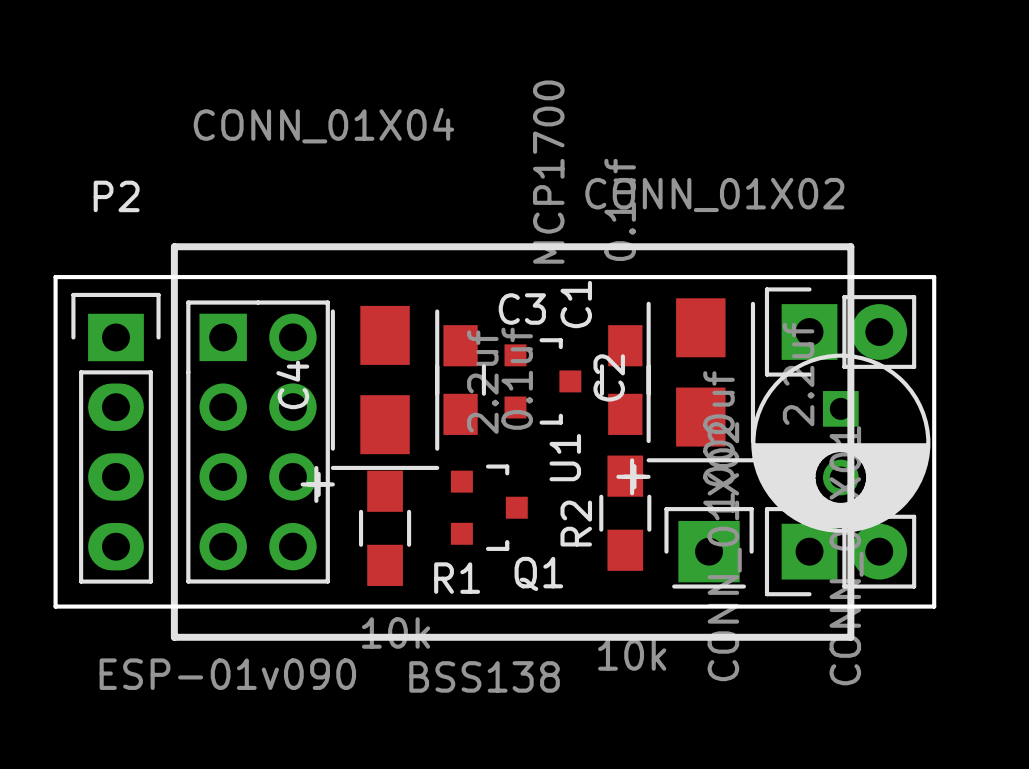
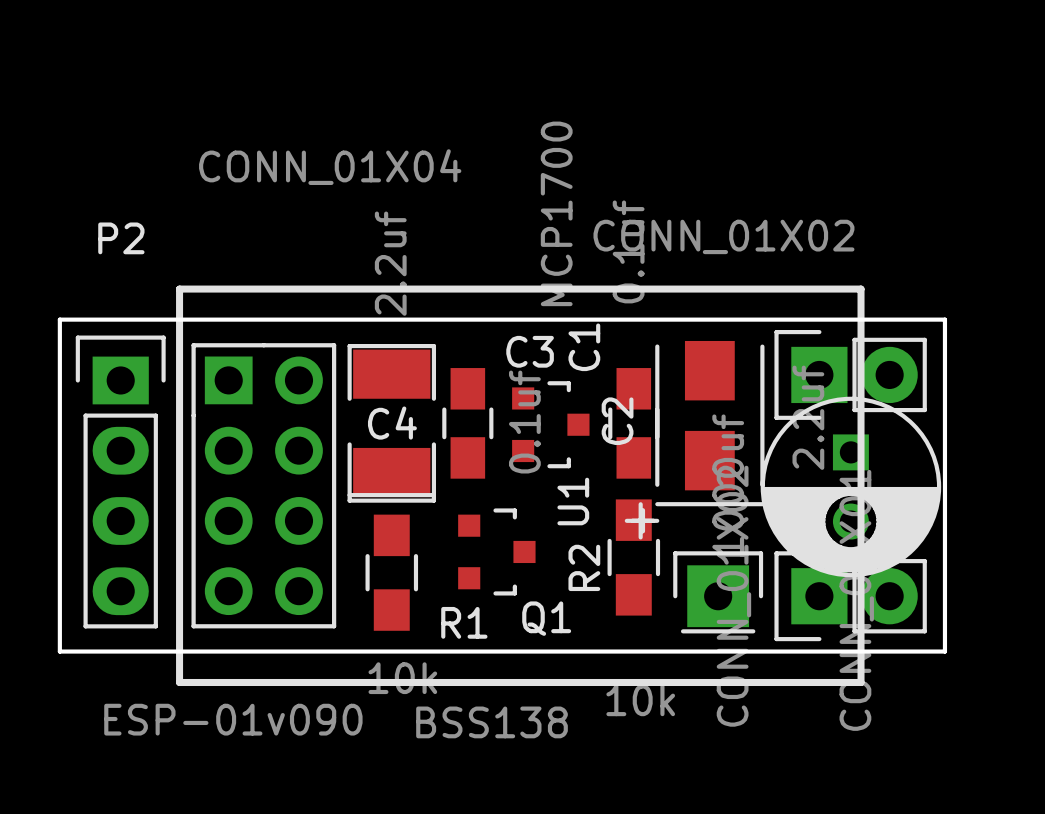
C4 footprint: [300, 305, 440, 503] -> [347, 343, 437, 503]
C4 value position: 2.2uf (482, 382) -> 2.2uf (390, 263)
C4 name position: C4 (292, 384) -> C4 (392, 423)

